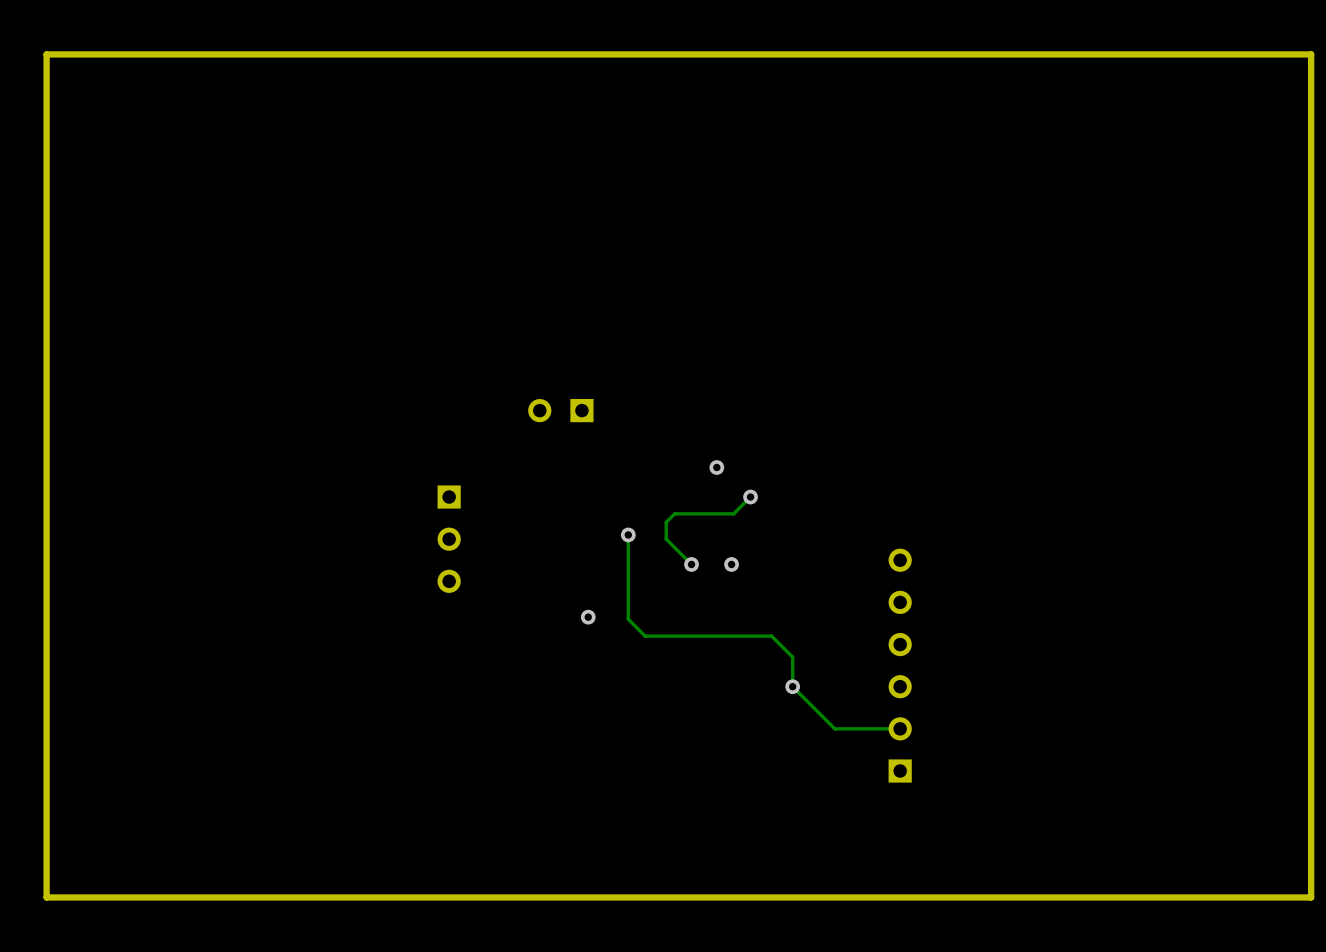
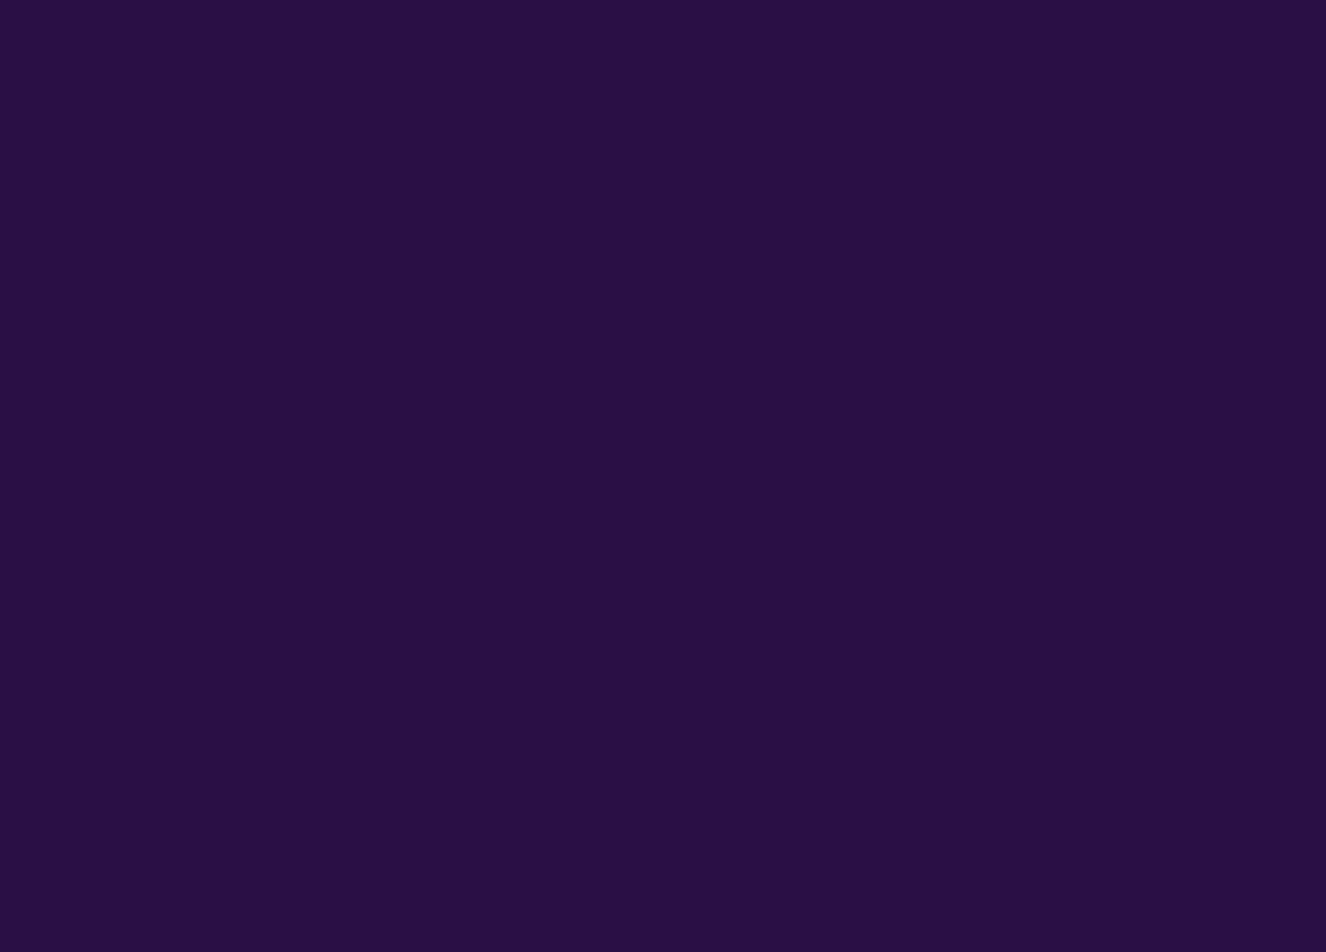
board edge: (1311, 54) (1311, 897) (46, 897) (46, 54) (1311, 54) -> none
part: (560, 410) -> none
via: (716, 467) -> none
track: (750, 497) (733, 513) (674, 513) (666, 522) (666, 539) (691, 564) -> none
via: (750, 497) -> none
track: (628, 534) (628, 619) (645, 636) (771, 636) (792, 657) (792, 686) (834, 728) (900, 728) -> none
via: (628, 534) -> none
part: (449, 539) -> none
via: (691, 564) -> none
via: (731, 564) -> none
via: (588, 617) -> none
part: (900, 665) -> none
via: (792, 686) -> none

